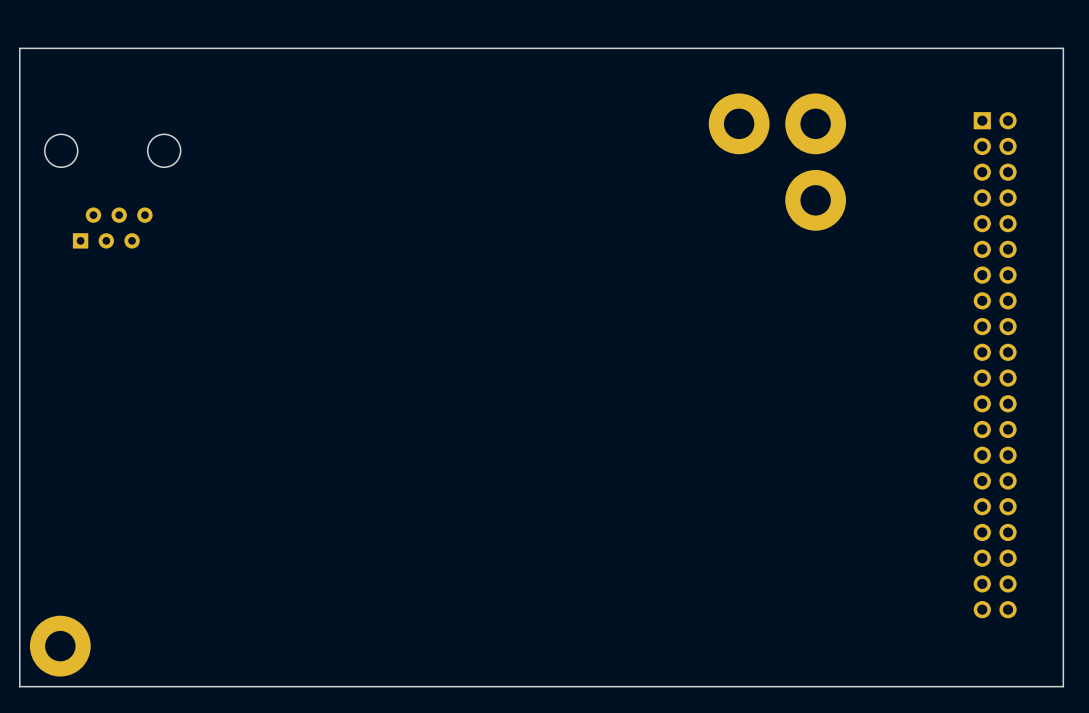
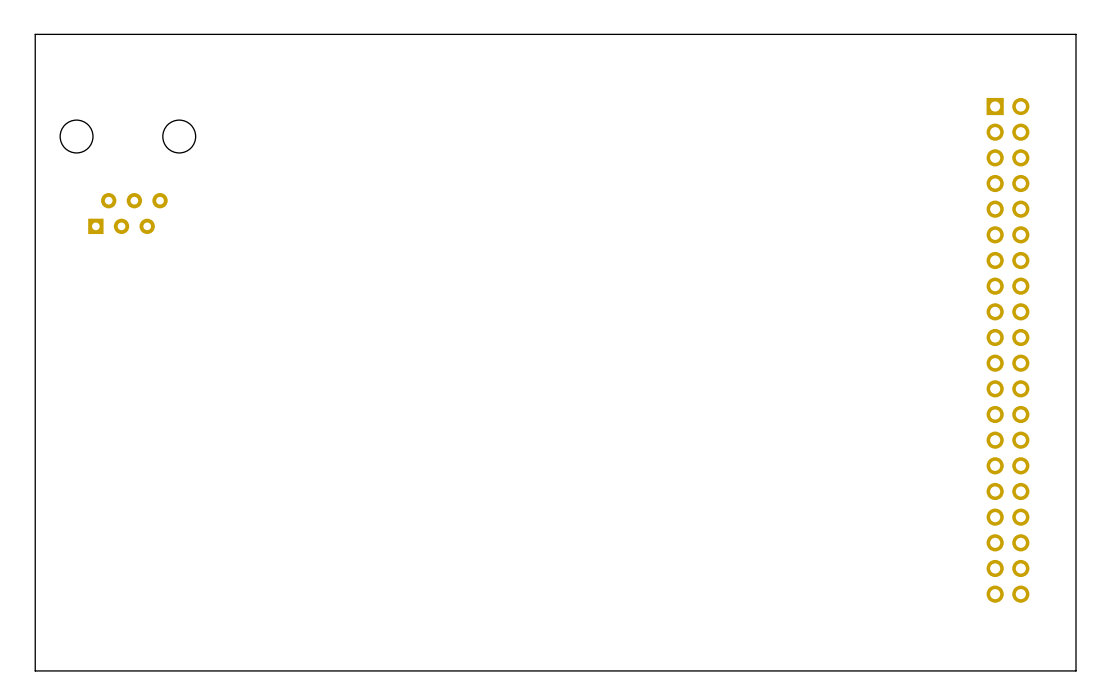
part: (739, 123) -> none
part: (815, 123) -> none
part: (815, 200) -> none
part: (60, 646) -> none

